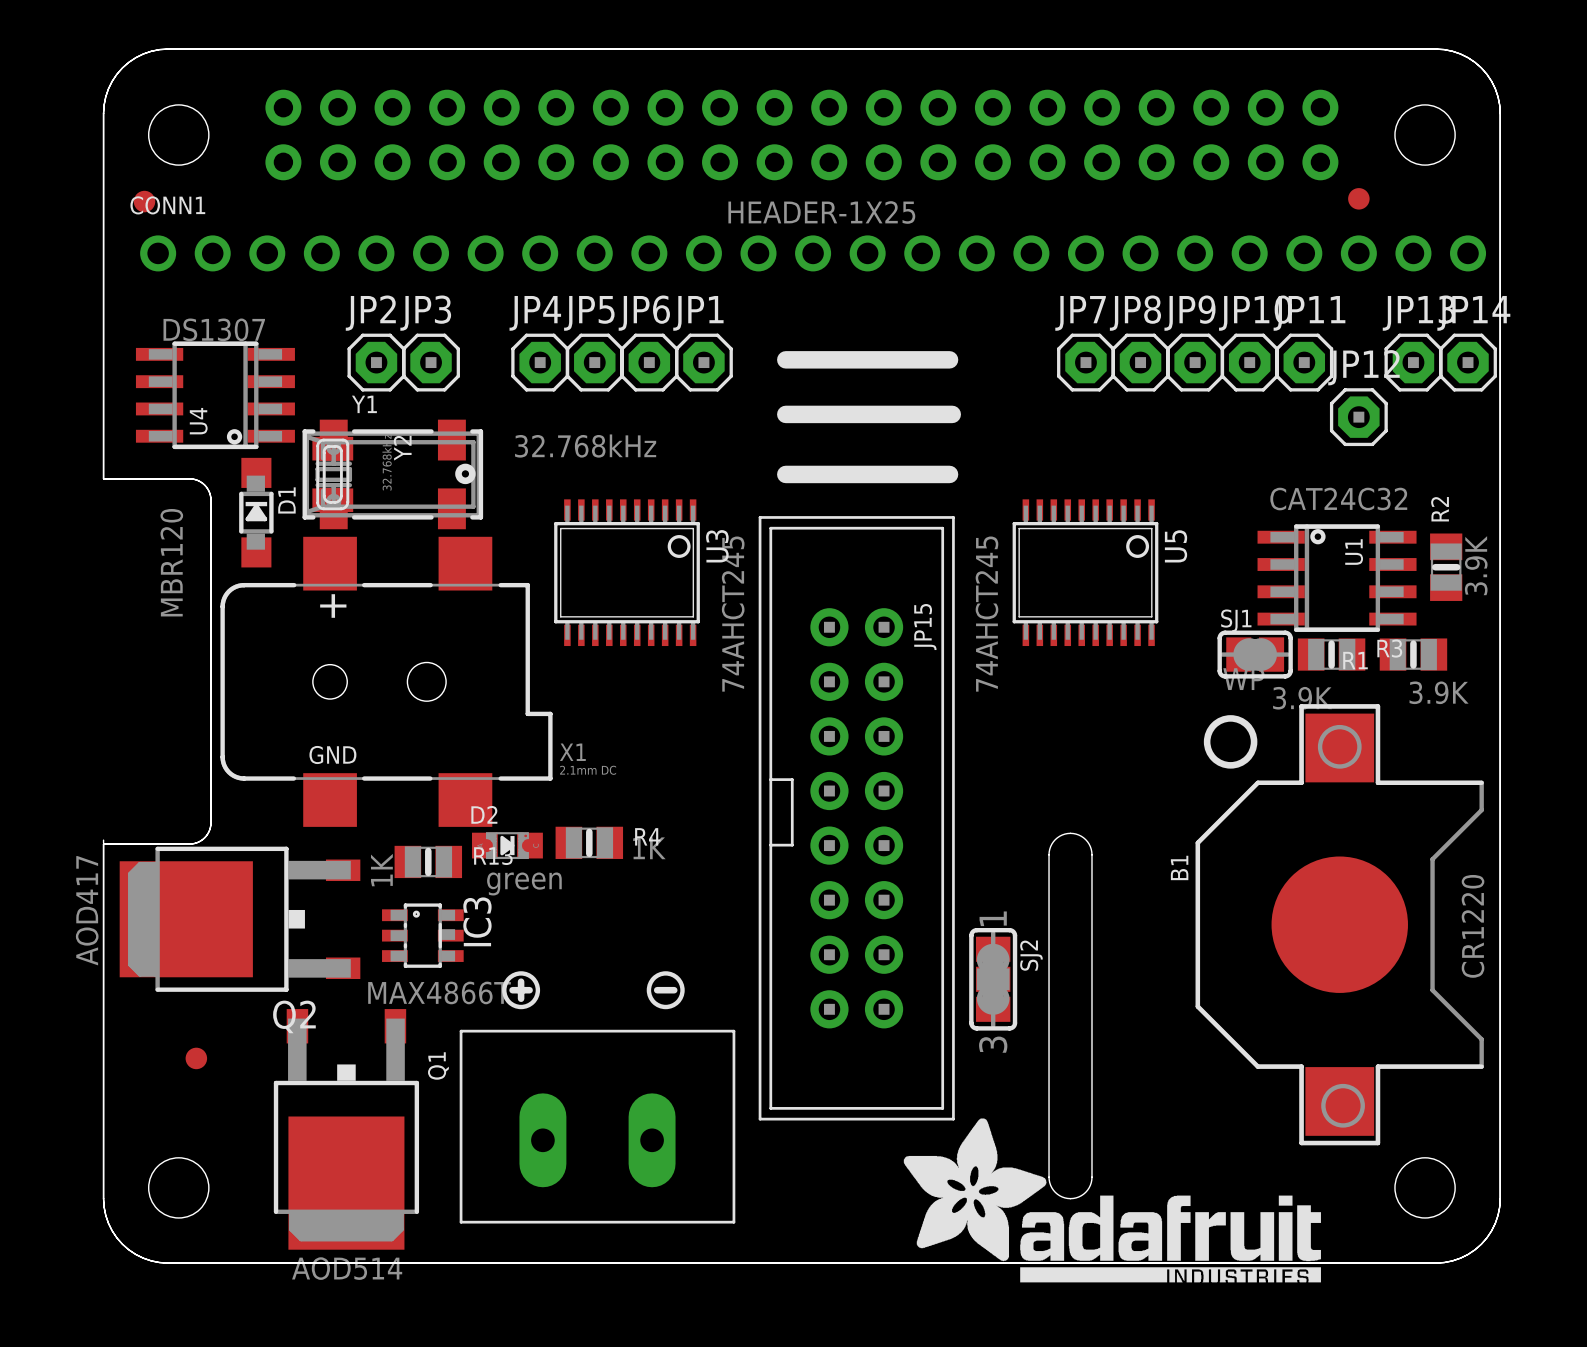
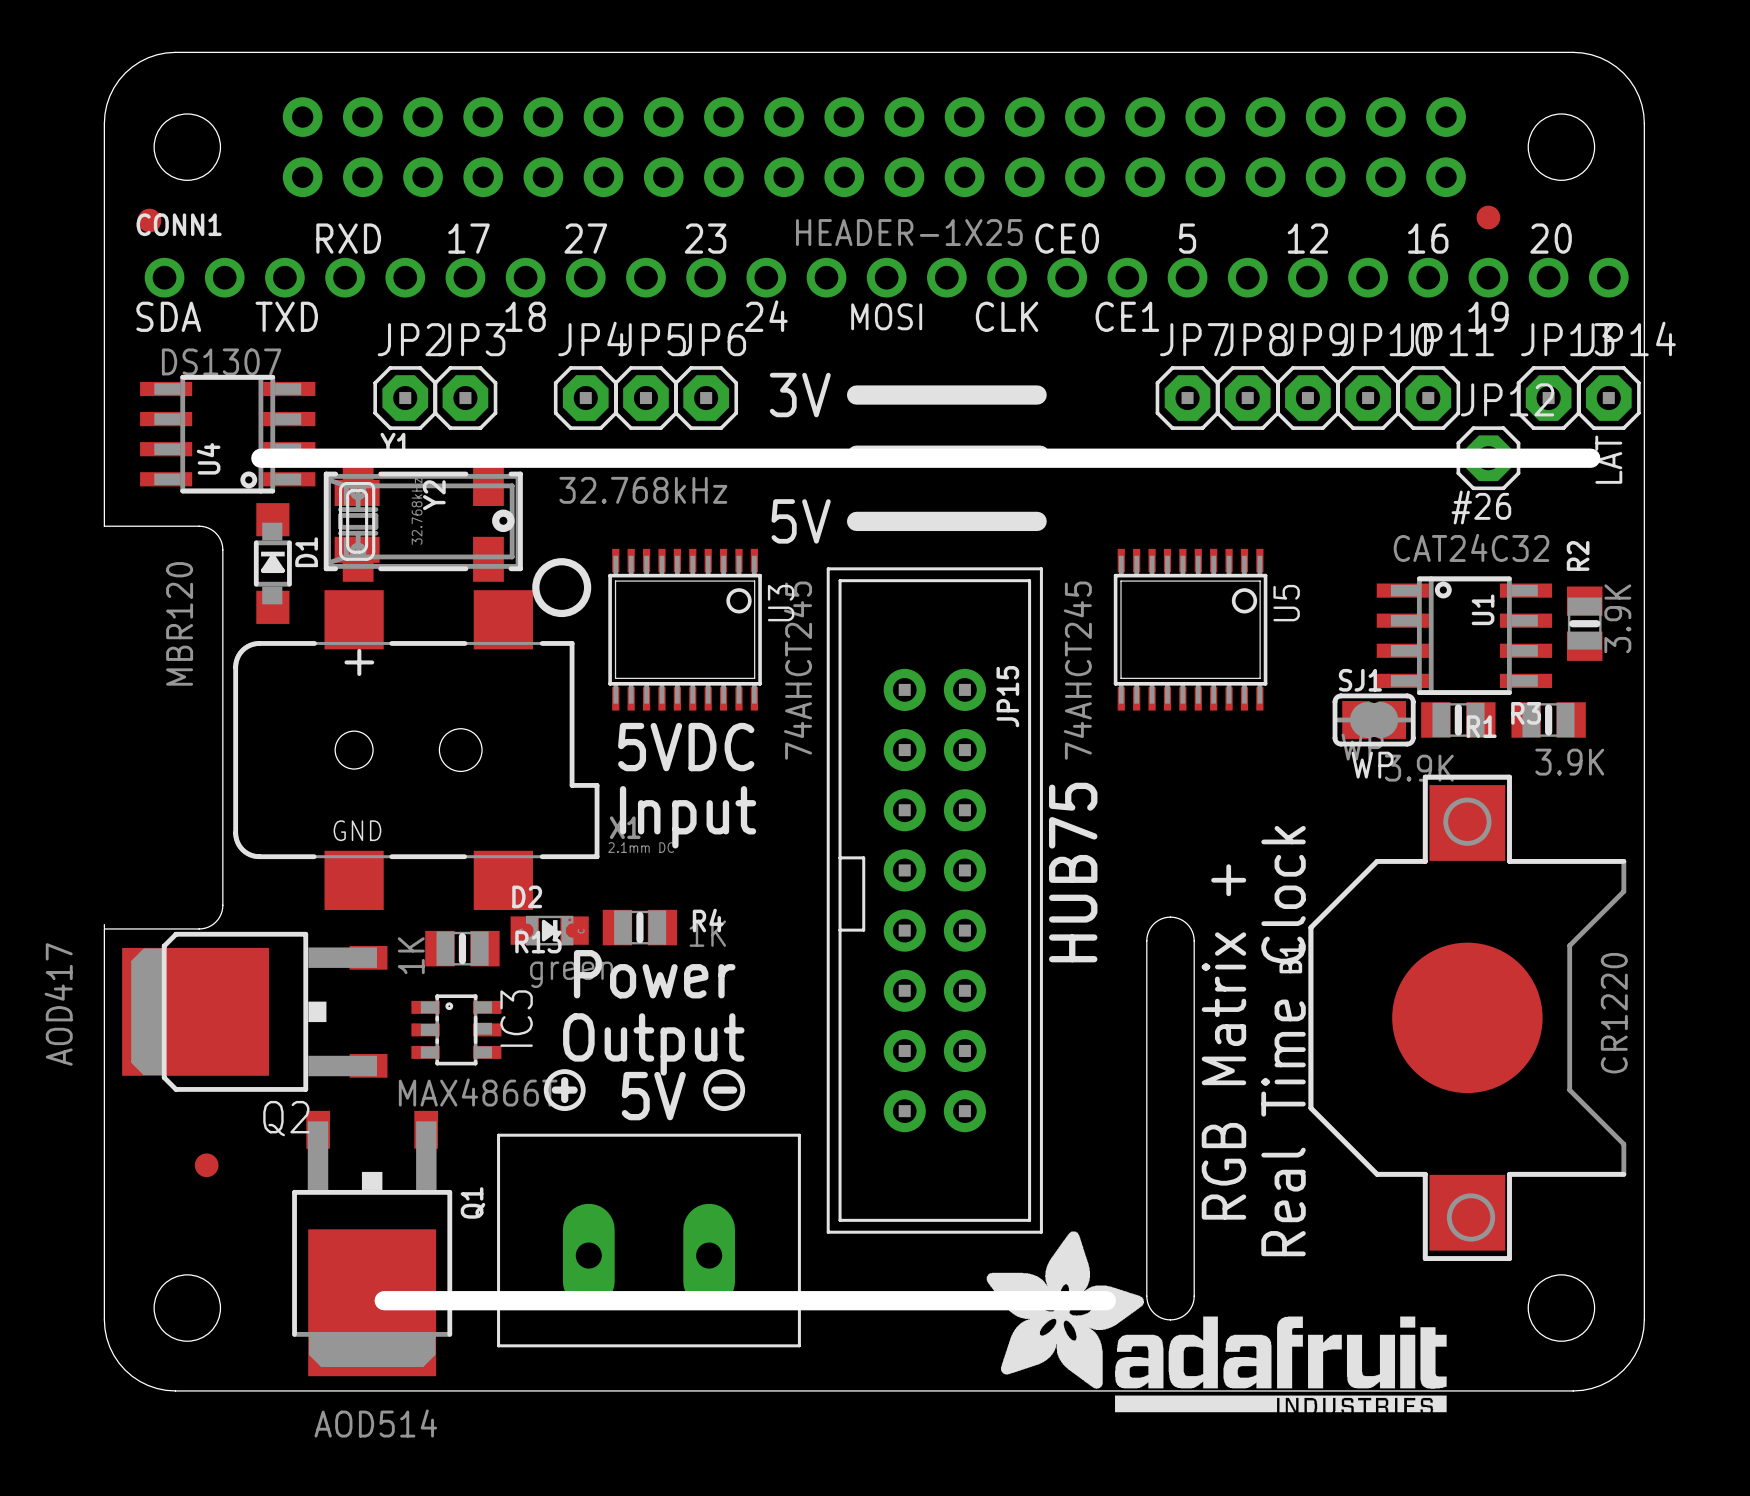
board edge: (168, 49) (1435, 49) (1460, 53) (1481, 67) (1495, 88) (1500, 113) (1500, 1198) (1495, 1223) (1481, 1244) (1460, 1258) (1435, 1263) (168, 1263) (143, 1258) (122, 1244) (108, 1223) (103, 1198) (103, 844) (195, 843) (206, 835) (211, 822) (210, 494) (202, 483) (192, 478) (103, 478) (104, 105) (112, 81) (128, 62) (151, 51) (168, 49) -> none
text: none -> RXD (348, 238)
text: none -> 17 (469, 238)
text: none -> 27 (585, 238)
text: none -> 23 (705, 238)
text: none -> CE0 (1067, 238)
text: none -> 12 (1307, 238)
text: none -> 16 (1428, 238)
text: none -> 20 (1551, 238)
text: none -> 5 (1187, 238)
text: none -> SDA (168, 316)
text: none -> TXD (286, 316)
text: none -> 18 (525, 316)
text: none -> 24 (766, 316)
text: none -> MOSI (886, 316)
text: none -> CLK (1007, 316)
text: none -> CE1 (1127, 316)
text: none -> 19 (1488, 316)
text: none -> 3V (800, 395)
JP1: (703, 362) -> none
board edge: none -> (260, 458) (1590, 458)
text: none -> LAT (1608, 459)
text: none -> #26 (1481, 507)
text: none -> 5V (801, 521)
U3 footprint: [554, 499, 700, 647] -> [608, 548, 762, 711]
U5 footprint: [1012, 499, 1159, 647] -> [1113, 548, 1268, 711]
drawing: none -> [532, 558, 592, 618]
text: none -> 5VDC (686, 747)
text: none -> WP (1372, 765)
drawing: [1203, 715, 1258, 769] -> none
text: none -> Input (688, 817)
text: none -> HUB75 (1073, 872)
Q2 footprint: [119, 846, 361, 992] -> [122, 931, 388, 1092]
text: none -> Power (654, 974)
text: none -> Real Time Clock (1283, 1041)
text: none -> RGB Matrix + (1223, 1041)
text: none -> Output (653, 1044)
SJ2: (993, 979) -> none
text: none -> 5V (653, 1096)
Q1 name position: Q1 (438, 1065) -> Q1 (472, 1202)
board edge: none -> (384, 1300) (1106, 1300)
Q1 value position: AOD514 (347, 1268) -> AOD514 (375, 1423)

